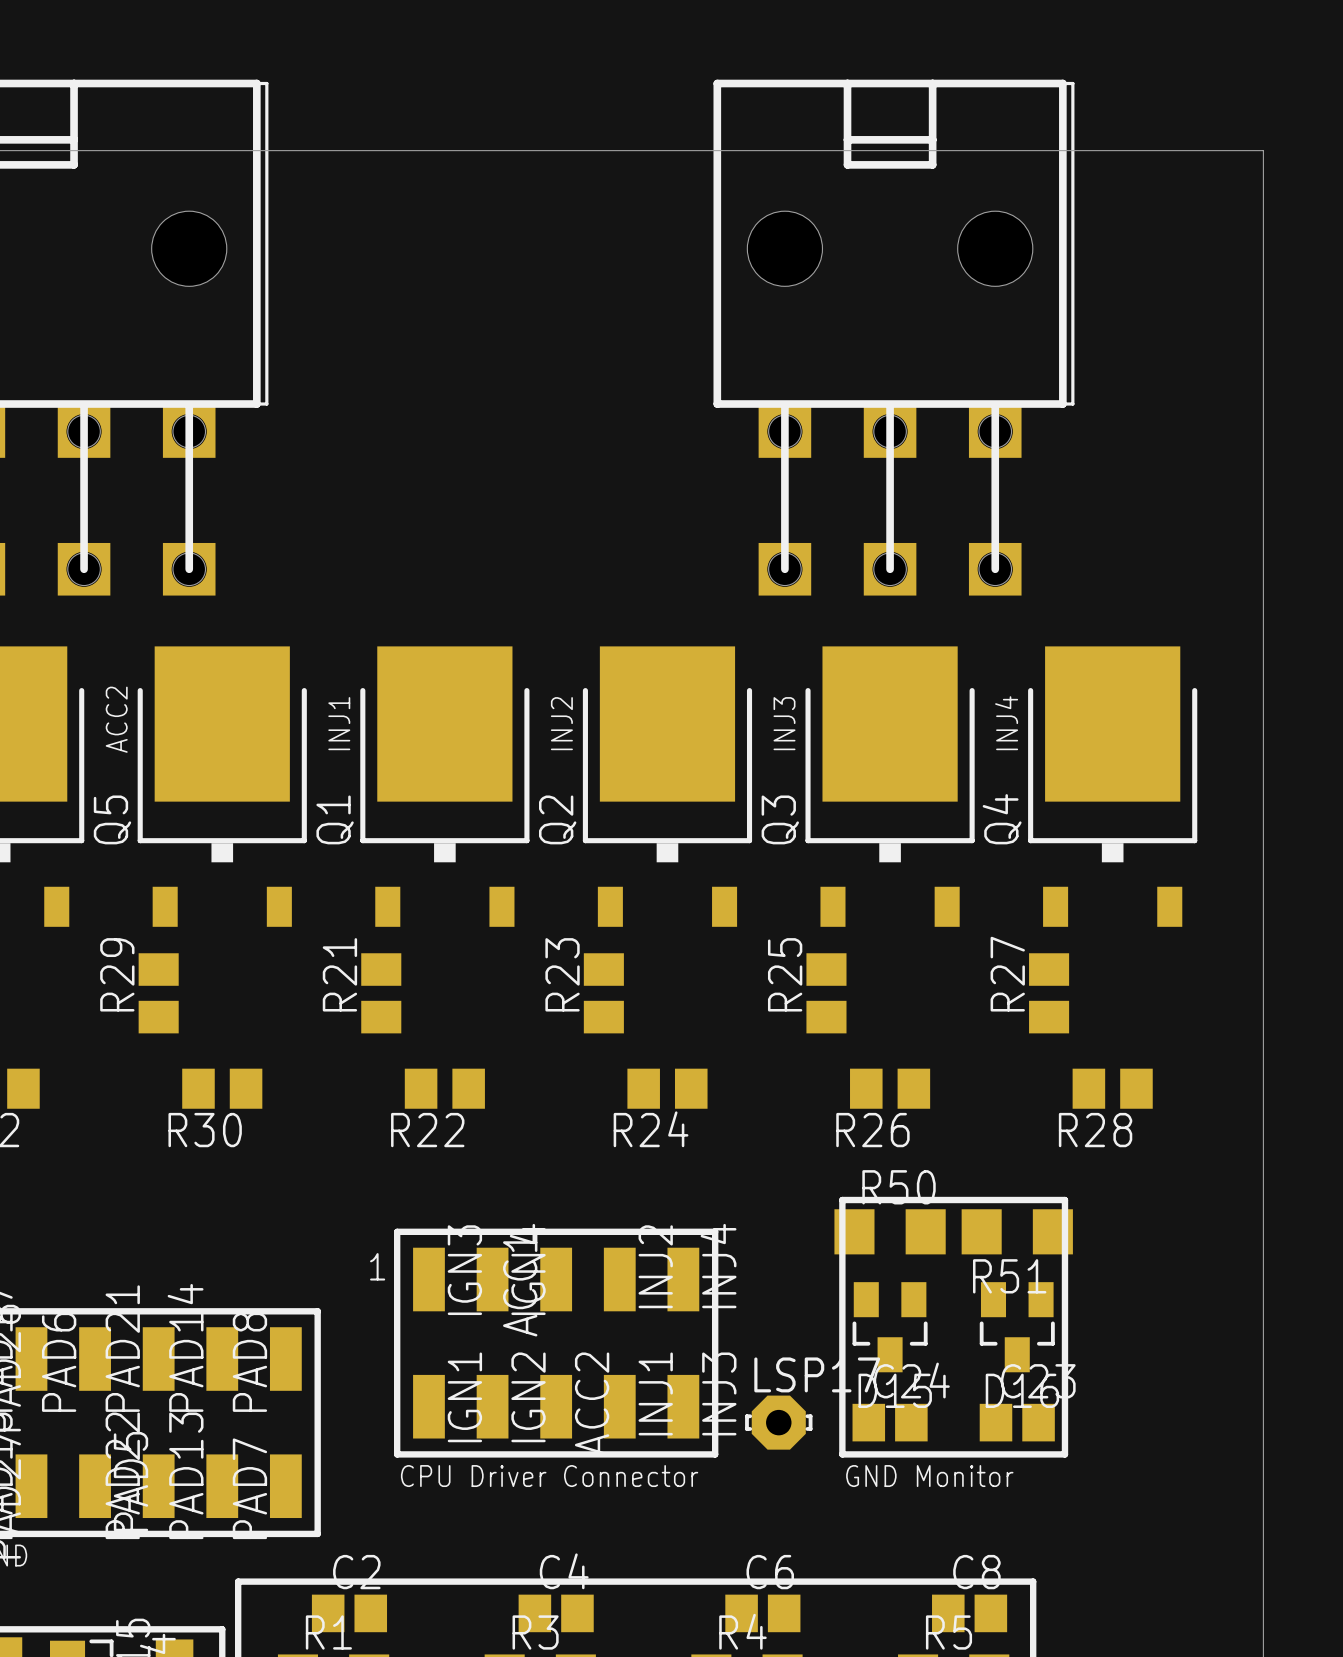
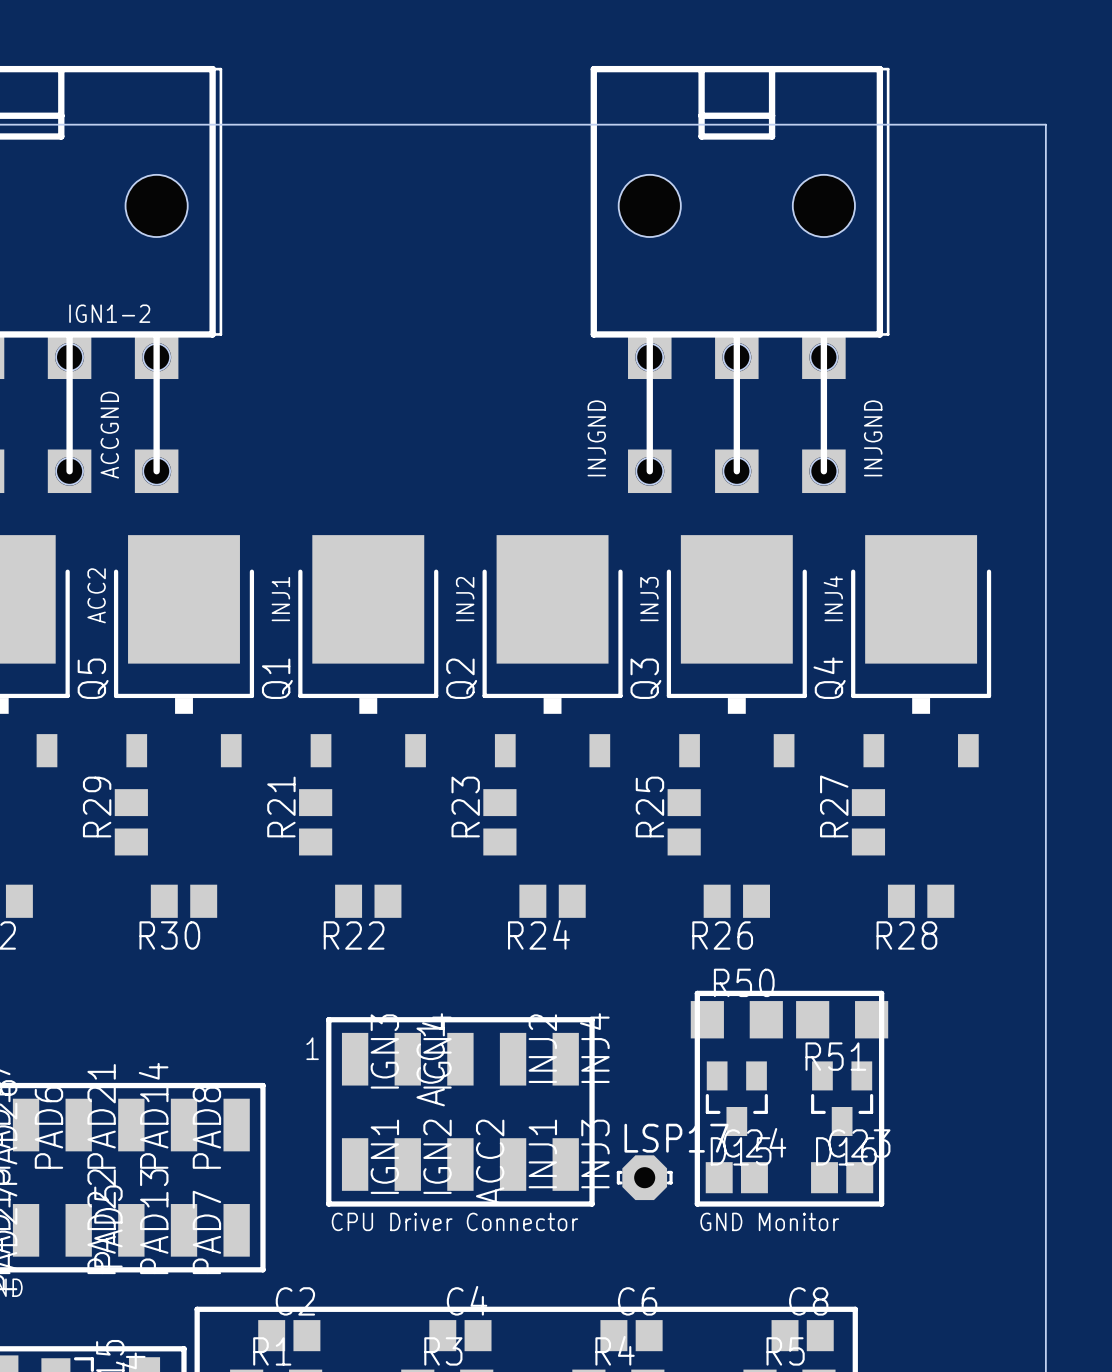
text: none -> IGN1-2 (109, 313)
text: none -> ACCGND (109, 435)
text: none -> INJGND (596, 438)
text: none -> INJGND (873, 438)

